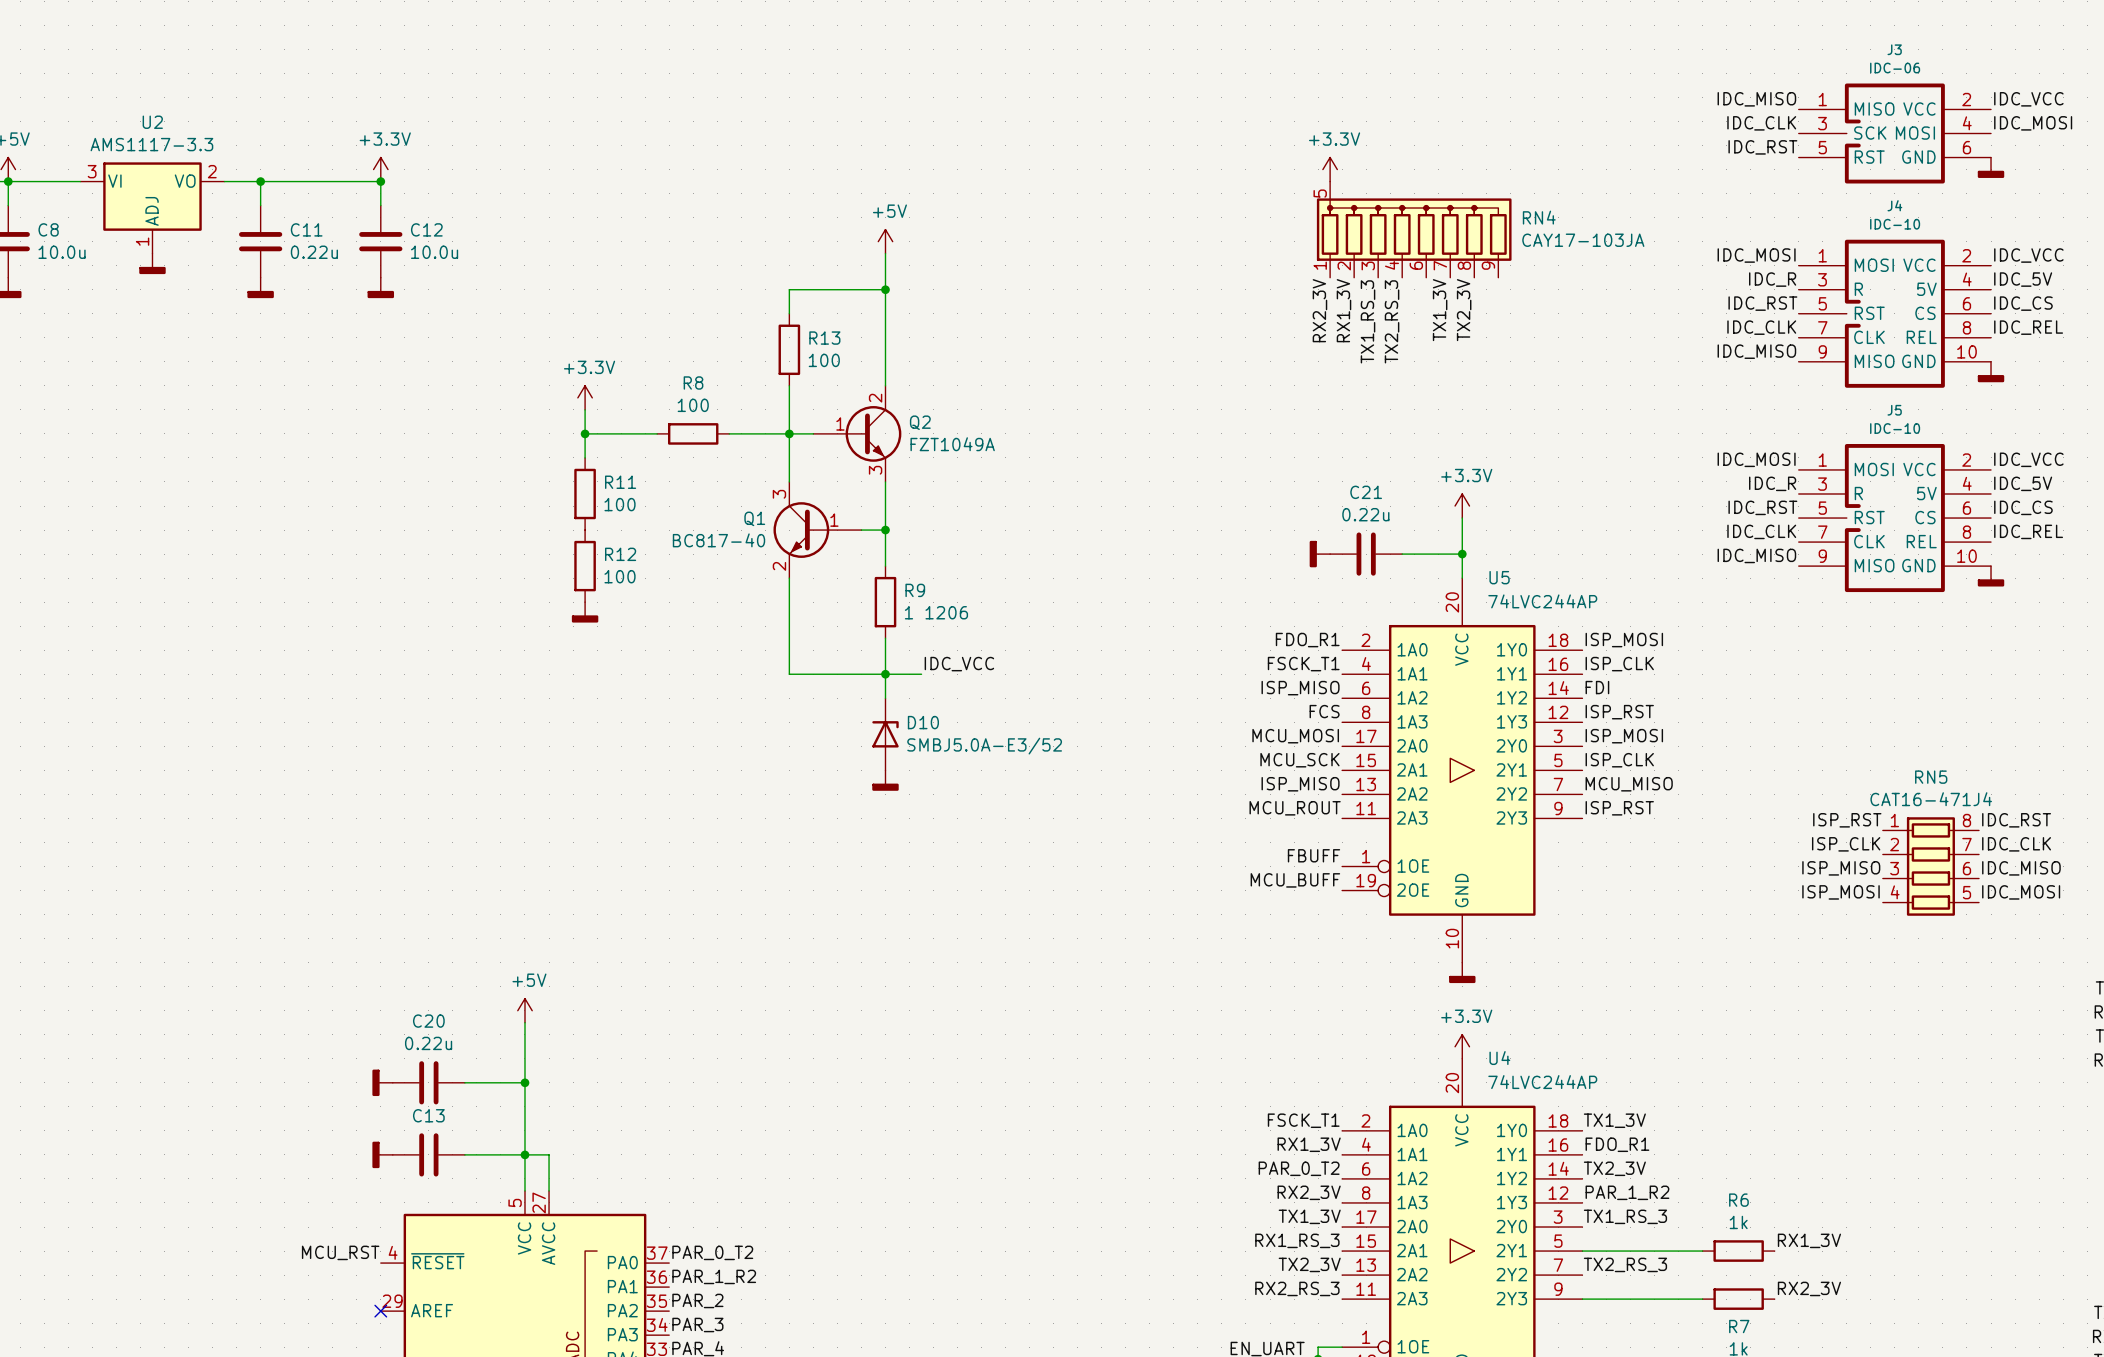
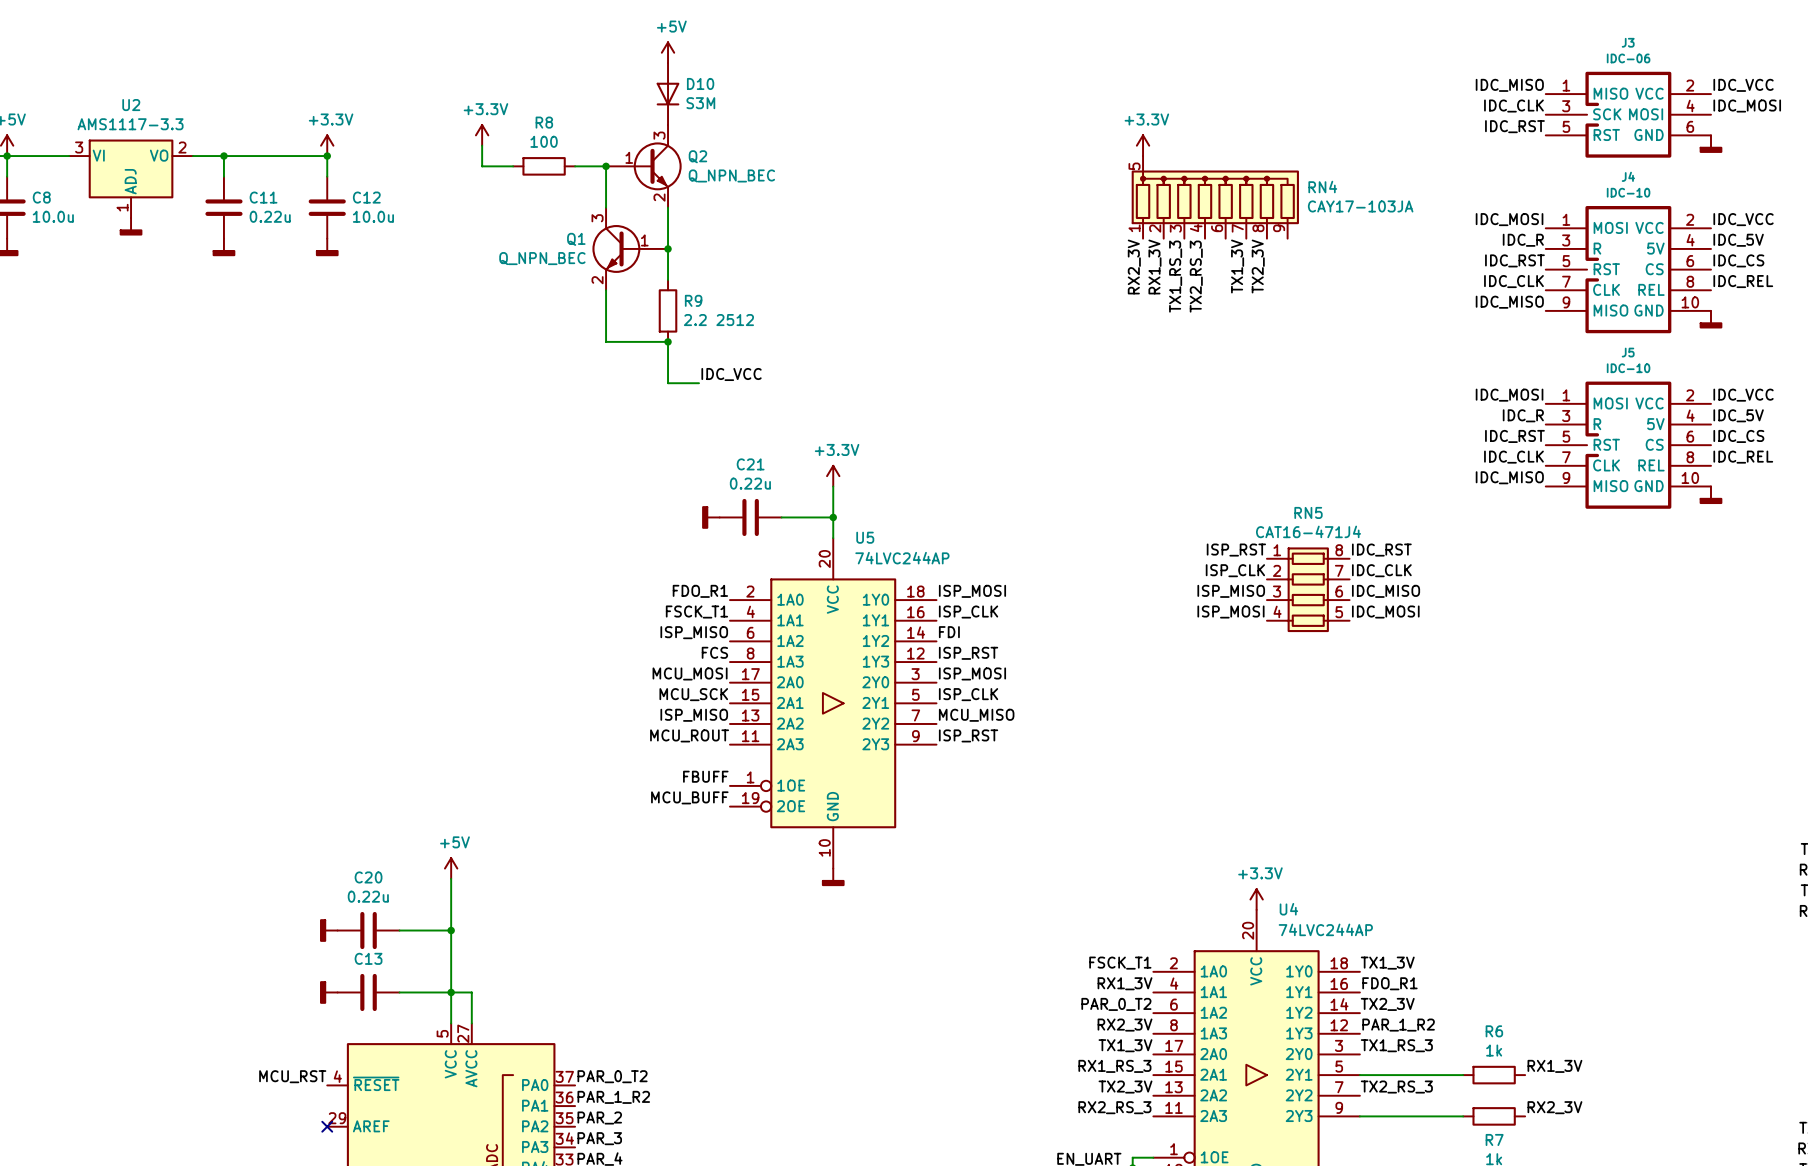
power symbol: none -> +3.3V (482, 135)
wire: none -> (482, 145) (482, 166) (513, 166)
wire: none -> (575, 166) (606, 166) (606, 207)
junction: none -> (606, 166)
wire: none -> (668, 207) (668, 279)
power symbol position: +5V (885, 241) -> +5V (668, 52)
wire: (885, 253) (885, 385) -> none
junction: none -> (668, 248)
wire: (885, 289) (789, 289) (789, 313) -> none
junction: (885, 289) -> none
wire: none -> (606, 290) (606, 341) (668, 341) (668, 383) (698, 383)
R13: 100 (789, 349) -> none
wire: (789, 385) (789, 481) -> none
power symbol: +3.3V (585, 397) -> none
Q2 pin number: 2 (875, 398) -> 3 (659, 135)
wire: (585, 409) (585, 457) -> none
wire: (585, 433) (657, 433) -> none
junction: (585, 433) -> none
R8 position: (693, 433) -> (544, 166)
wire: (729, 433) (813, 433) -> none
junction position: (789, 433) -> (668, 341)
Q2 position: (857, 433) -> (643, 166)
label: none -> IDC_VCC (731, 374)
Q2 value: FZT1049A (952, 444) -> Q_NPN_BEC (731, 175)
Q2 pin number: 3 (875, 470) -> 2 (659, 197)
wire: (885, 481) (885, 566) -> none
R11: 100 (585, 493) -> none
power symbol: +3.3V (1462, 506) -> none
wire: (1462, 518) (1462, 578) -> none
Q1 position: (817, 530) -> (630, 248)
wire: (861, 530) (885, 530) -> none
junction: (885, 530) -> none
Q1 value: BC817-40 (719, 540) -> Q_NPN_BEC (542, 258)
power symbol: none -> +3.3V (833, 476)
power symbol: (1319, 554) -> none
C21 position: (1366, 554) -> (750, 517)
wire: (1402, 554) (1462, 554) -> none
junction: (1462, 554) -> none
R12: 100 (585, 566) -> none
wire: (789, 578) (789, 674) (921, 674) -> none
power symbol: none -> (710, 517)
R9 position: (885, 602) -> (668, 310)
wire: none -> (781, 517) (833, 517)
junction: none -> (833, 517)
power symbol: (585, 612) -> none
R9 value: 1 1206 (936, 612) -> 2.2 2512 (718, 320)
wire: (885, 638) (885, 698) -> (833, 486) (833, 538)
label: FDO_R1 (1307, 640) -> none
label: none -> ISP_RST (1236, 550)
label: none -> IDC_RST (1381, 550)
label: ISP_MOSI (1624, 640) -> none
label: IDC_VCC (959, 664) -> none
label: FSCK_T1 (1303, 664) -> none
label: none -> ISP_CLK (1235, 570)
label: ISP_CLK (1619, 664) -> IDC_CLK (1381, 570)
junction: (885, 674) -> none
label: FDI (1597, 687) -> none
label: none -> FDO_R1 (700, 591)
label: none -> ISP_MOSI (972, 591)
label: ISP_MISO (1300, 688) -> none
label: none -> ISP_MISO (1231, 591)
label: none -> IDC_MISO (1386, 591)
D10 symbol: [872, 698, 899, 771] -> [656, 63, 680, 126]
label: FCS (1324, 711) -> none
label: none -> FSCK_T1 (696, 612)
label: none -> ISP_CLK (968, 612)
label: none -> ISP_MOSI (1230, 612)
label: ISP_RST (1619, 712) -> none
label: none -> FDI (949, 632)
label: none -> ISP_MISO (694, 632)
label: MCU_MOSI (1295, 736) -> none
label: ISP_MOSI (1624, 736) -> IDC_MOSI (1385, 612)
D10 value: SMBJ5.0A-E3/52 (984, 746) -> S3M (700, 103)
label: none -> FCS (714, 652)
label: none -> ISP_RST (968, 653)
label: MCU_SCK (1299, 760) -> none
label: ISP_CLK (1619, 760) -> none
U5 position: (1462, 770) -> (833, 703)
power symbol: (885, 780) -> none
label: none -> MCU_MOSI (690, 673)
label: none -> ISP_MOSI (972, 673)
label: ISP_MISO (1300, 784) -> none
label: MCU_MISO (1629, 784) -> none
label: none -> MCU_SCK (693, 694)
label: none -> ISP_CLK (968, 694)
label: MCU_ROUT (1295, 808) -> none
label: ISP_RST (1619, 808) -> none
label: ISP_RST (1847, 820) -> none
label: IDC_RST (2016, 820) -> none
label: none -> ISP_MISO (694, 715)
label: none -> MCU_MISO (976, 715)
label: ISP_CLK (1846, 844) -> none
label: IDC_CLK (2016, 844) -> none
label: FBUFF (1313, 855) -> none
label: none -> MCU_ROUT (689, 735)
label: none -> ISP_RST (968, 735)
RN5 position: (1930, 866) -> (1308, 589)
label: ISP_MISO (1841, 868) -> none
label: IDC_MISO (2021, 868) -> none
label: MCU_BUFF (1295, 880) -> none
label: ISP_MOSI (1841, 892) -> none
label: IDC_MOSI (2021, 892) -> none
label: none -> FBUFF (705, 776)
label: none -> MCU_BUFF (689, 797)
power symbol: (1462, 972) -> none
power symbol: none -> (833, 877)

